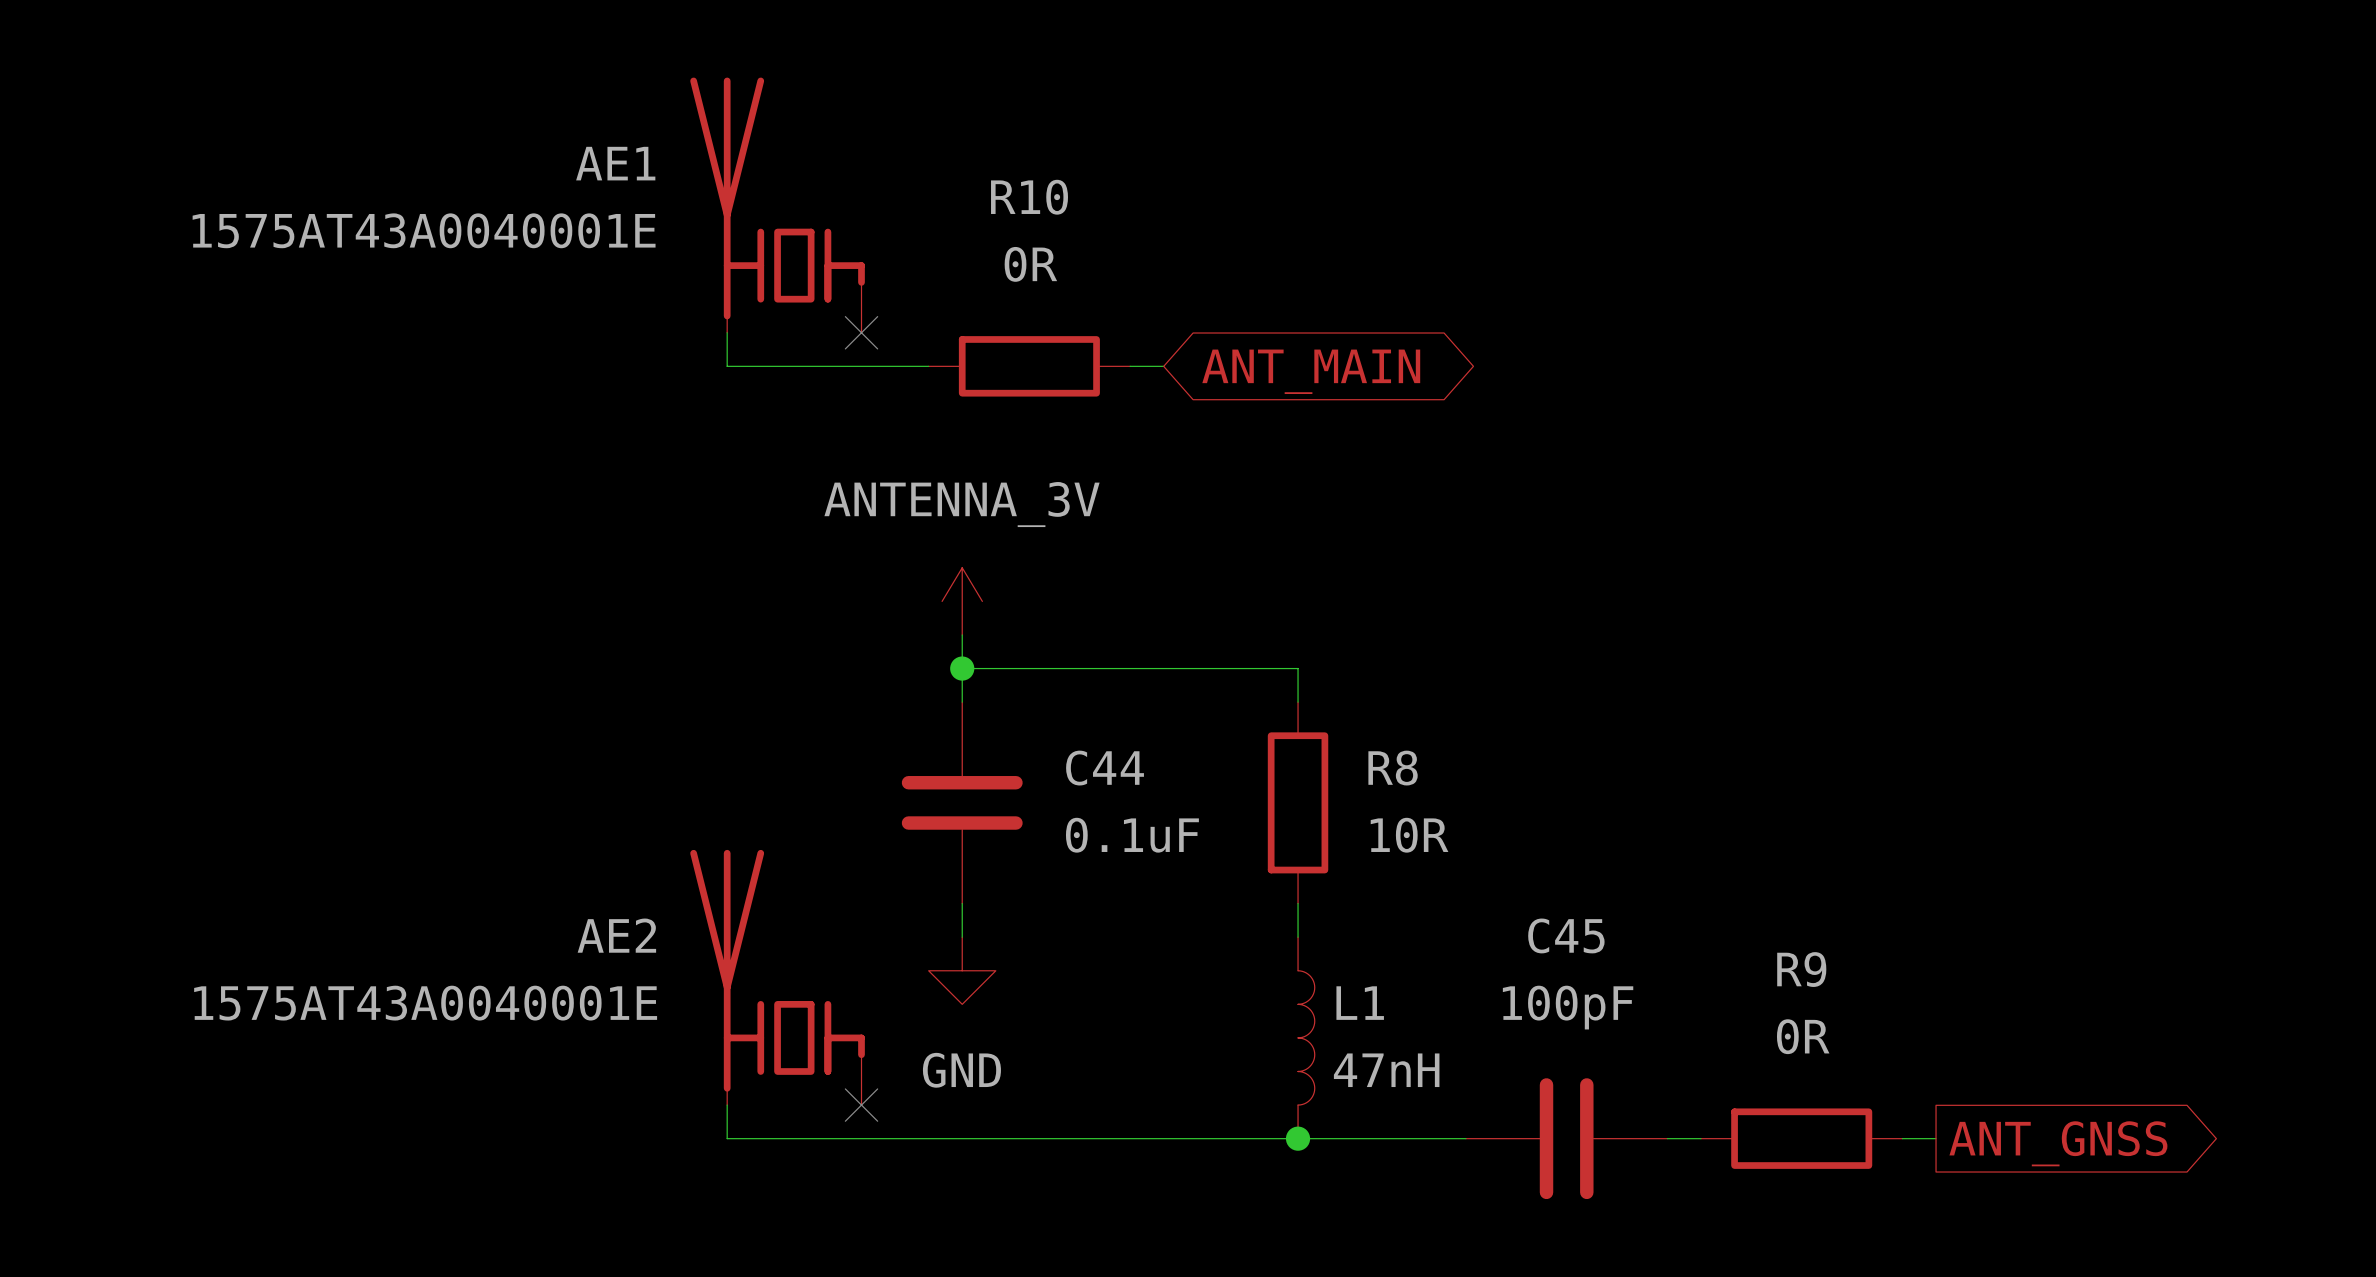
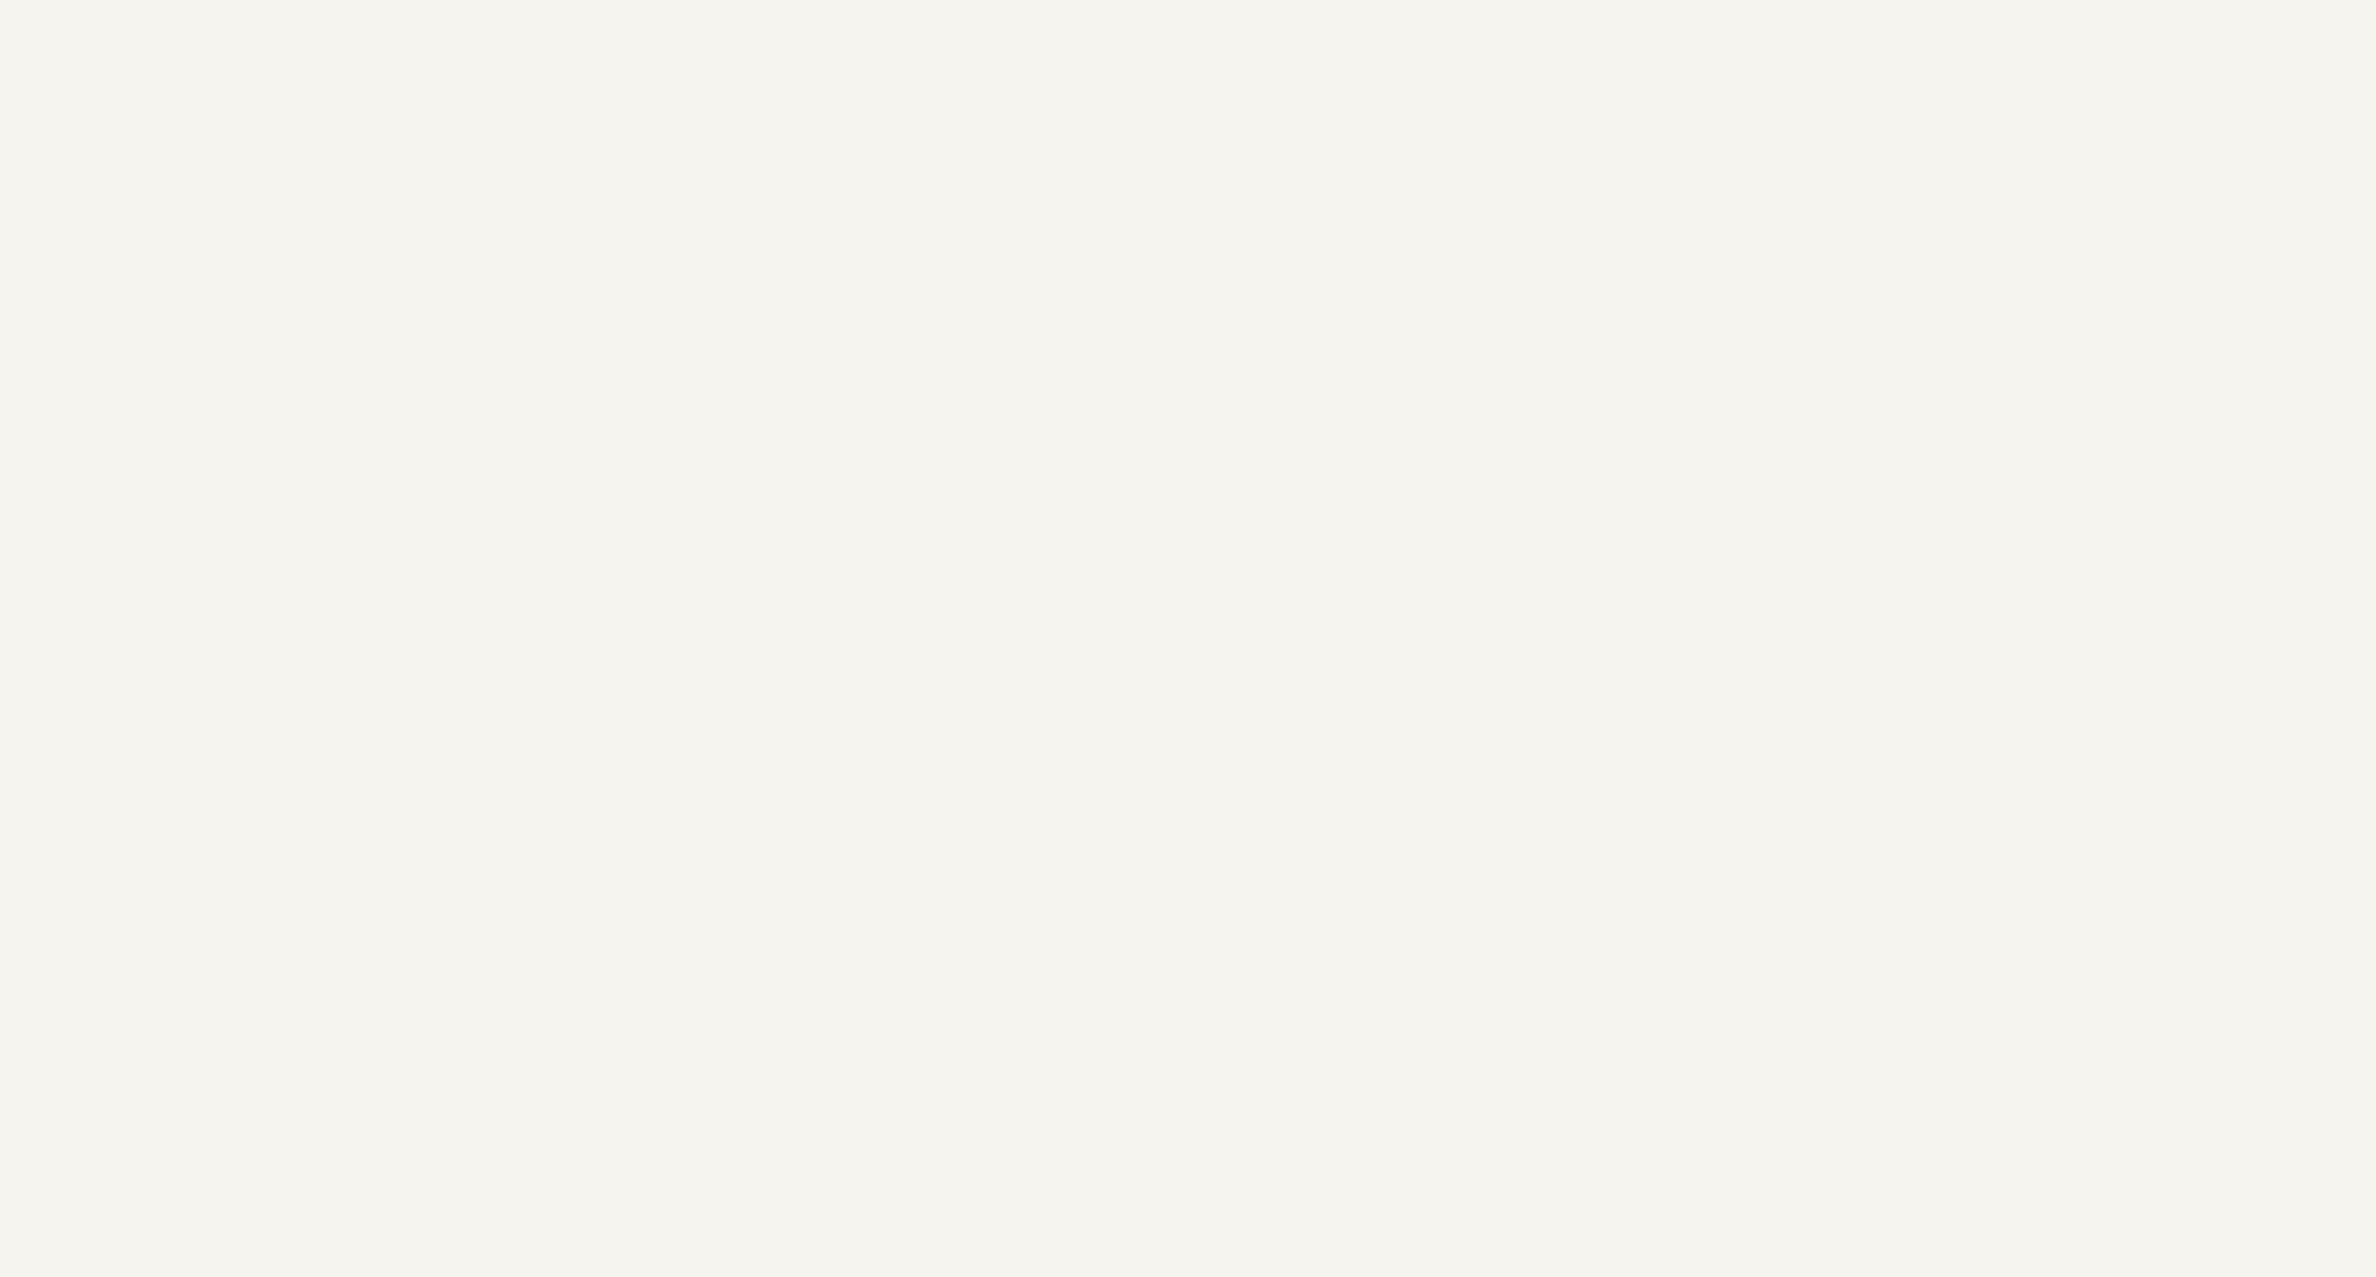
AE1: 1575AT43A0040001E (777, 205) -> none
wire: (727, 332) (727, 366) (928, 366) -> none
no-connect mark: (861, 332) -> none
R10: 0R (1029, 366) -> none
wire: (1130, 366) (1163, 366) -> none
global label: ANT_MAIN (1311, 371) -> none
power symbol: ANTENNA_3V (962, 601) -> none
wire: (962, 634) (962, 702) -> none
wire: (962, 668) (1298, 668) (1298, 702) -> none
junction: (962, 668) -> none
C44: 0.1uF (962, 802) -> none
R8: 10R (1298, 802) -> none
wire: (962, 903) (962, 937) -> none
wire: (1298, 903) (1298, 937) -> none
power symbol: GND (962, 970) -> none
AE2: 1575AT43A0040001E (777, 977) -> none
L1: 47nH (1306, 1037) -> none
wire: (727, 1105) (727, 1138) (1465, 1138) -> none
no-connect mark: (861, 1105) -> none
junction: (1298, 1138) -> none
C45: 100pF (1566, 1138) -> none
wire: (1667, 1138) (1700, 1138) -> none
R9: 0R (1801, 1138) -> none
wire: (1902, 1138) (1936, 1138) -> none
global label: ANT_GNSS (2058, 1143) -> none

